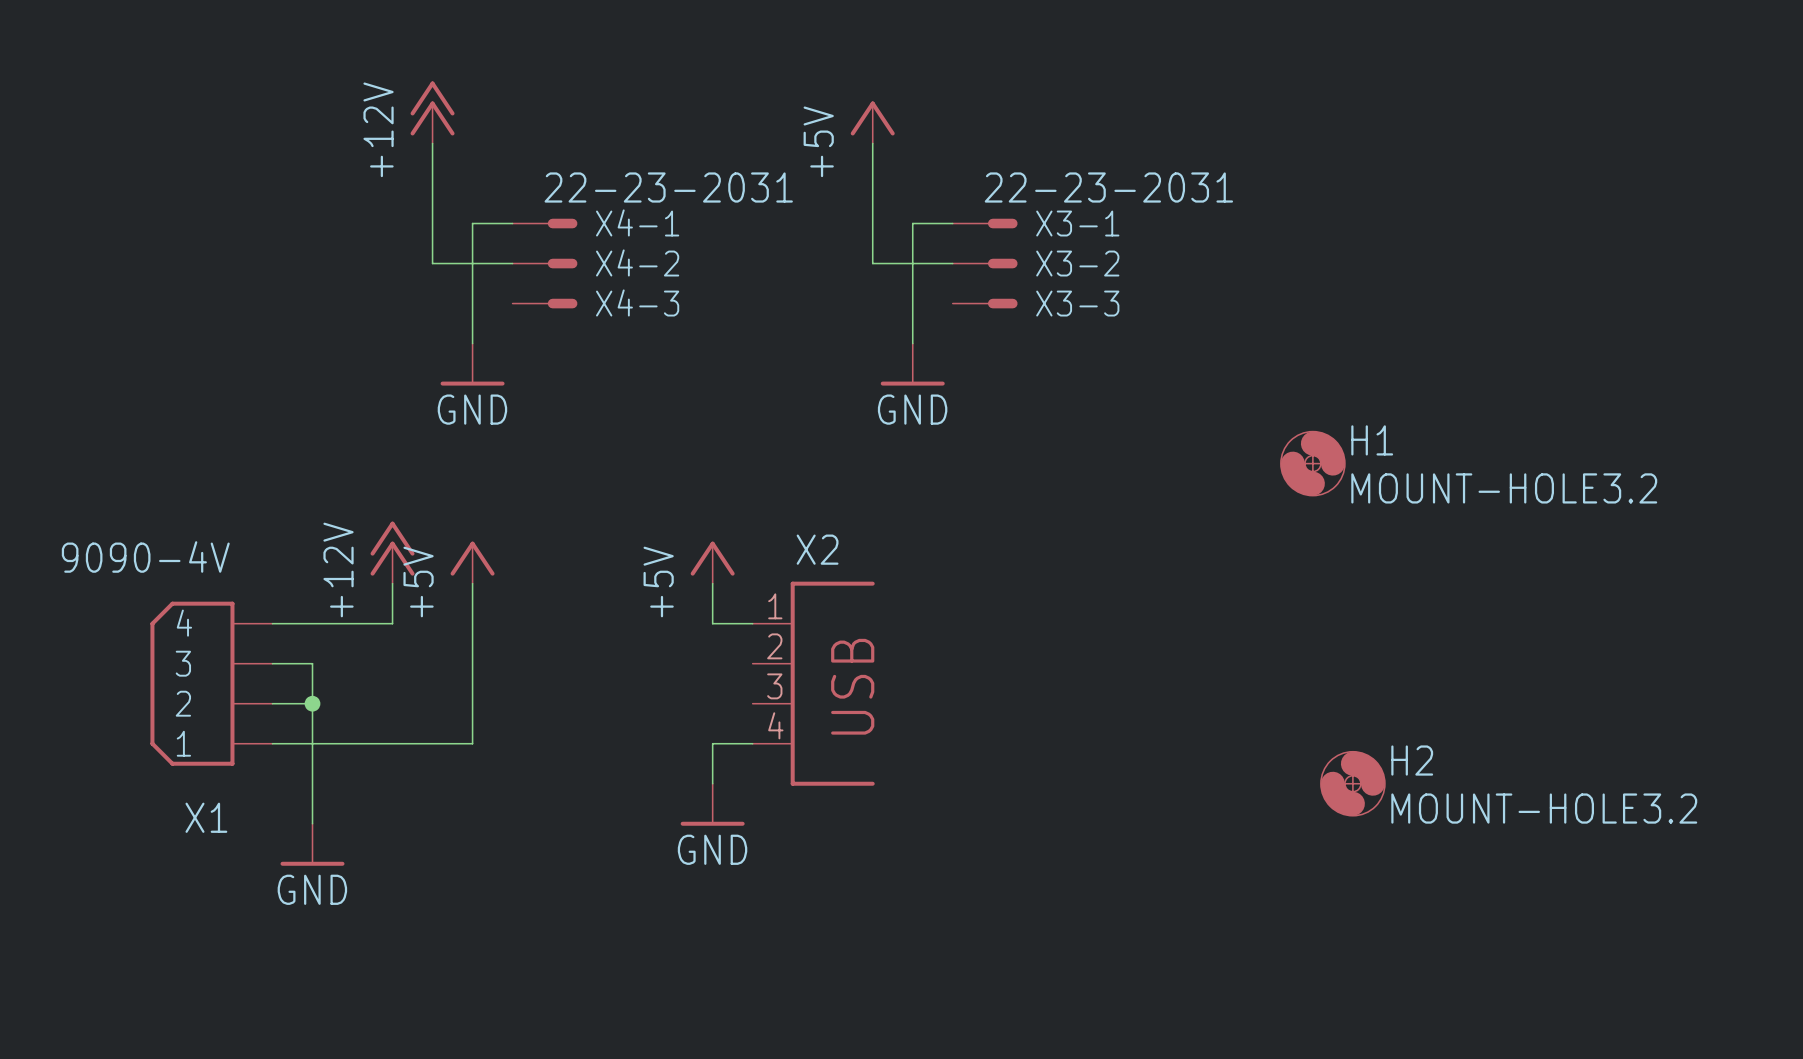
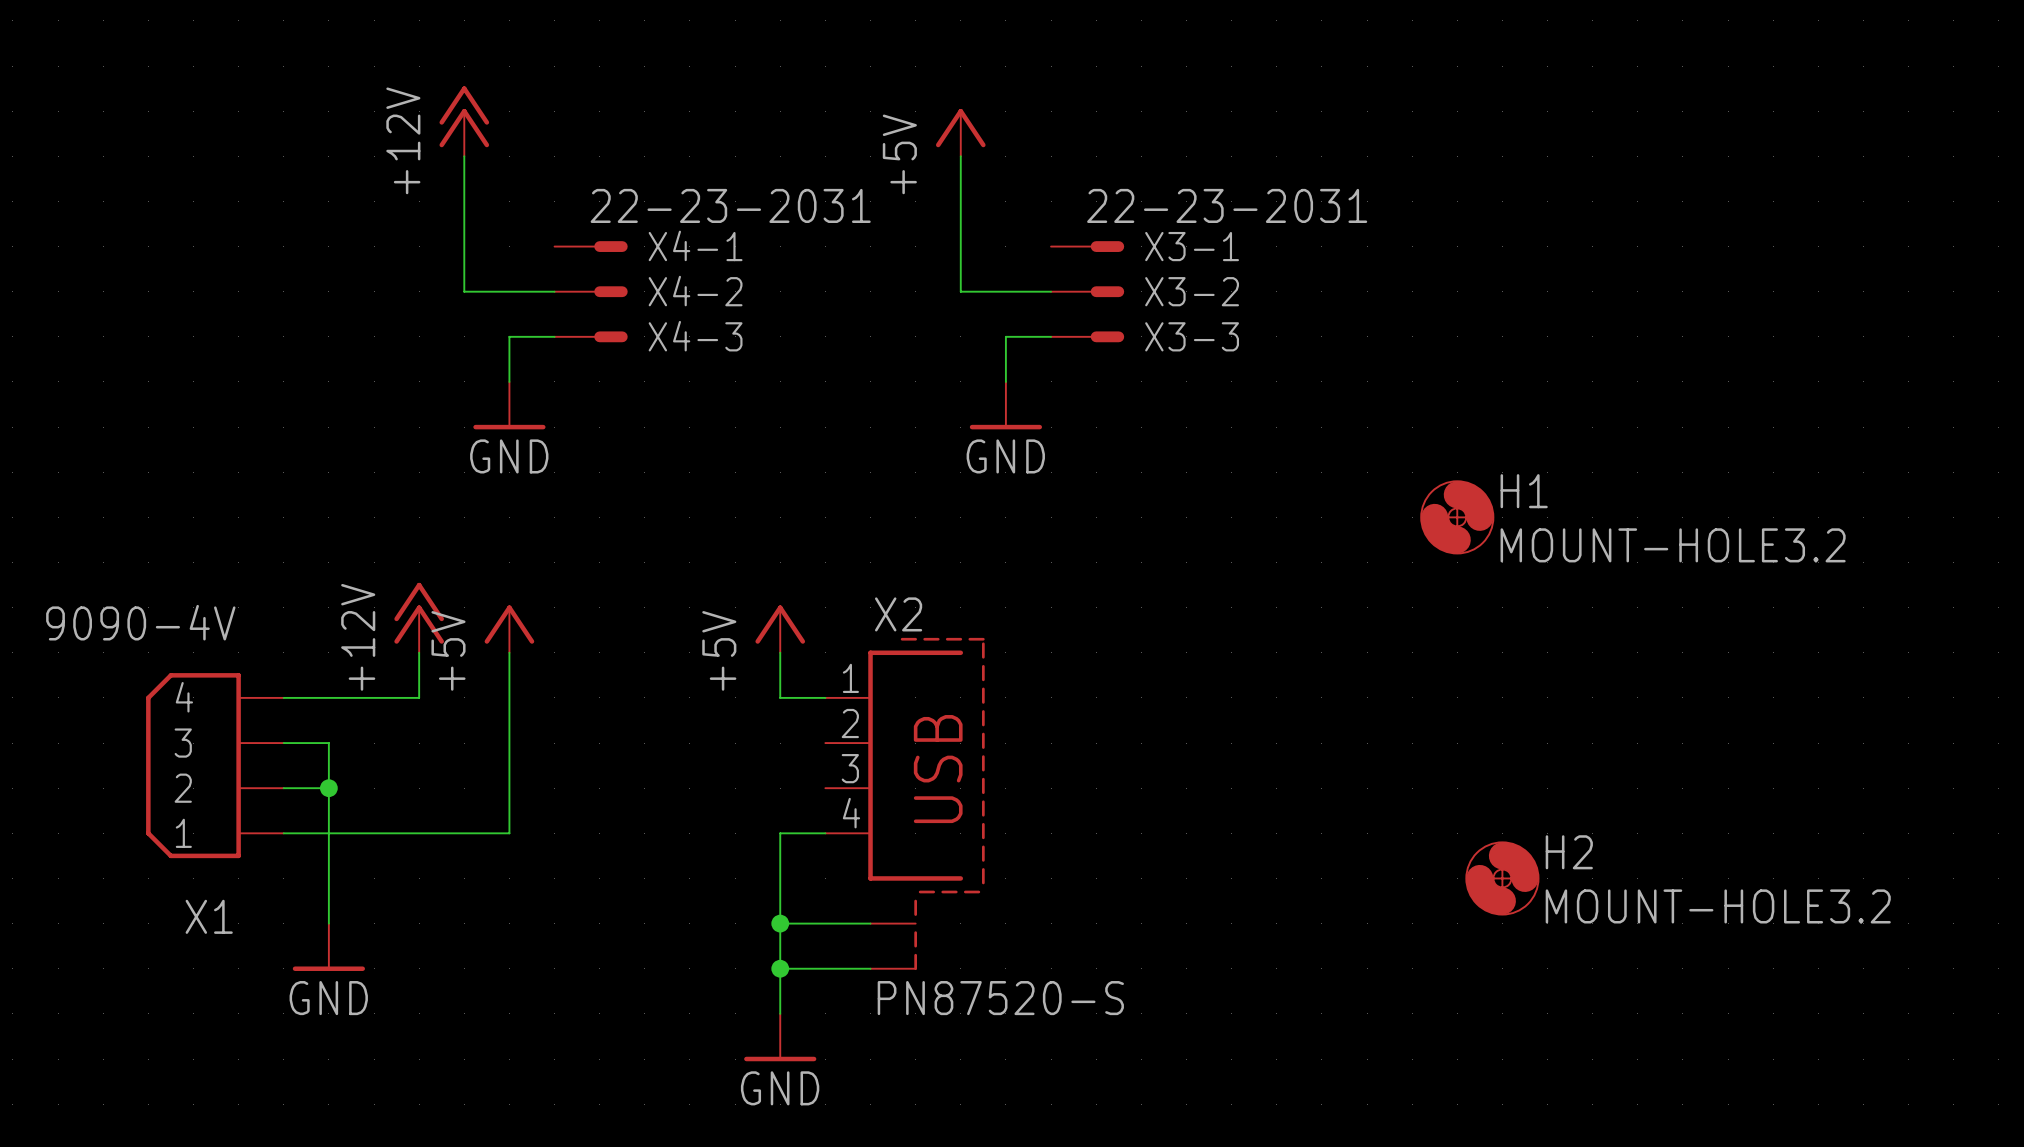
wire: (512, 223) (472, 223) (472, 303) -> (554, 336) (509, 336)
wire: (952, 223) (912, 223) (912, 303) -> (1051, 336) (1005, 336)
X2 symbol: [752, 581, 875, 786] -> [825, 637, 985, 971]
wire: none -> (780, 878) (780, 1013)
power symbol position: GND (712, 804) -> GND (780, 1037)
wire: none -> (780, 923) (870, 923)
junction: none -> (780, 923)
wire: none -> (780, 968) (870, 968)
junction: none -> (780, 968)
X2 value: none -> PN87520-S (1000, 998)

